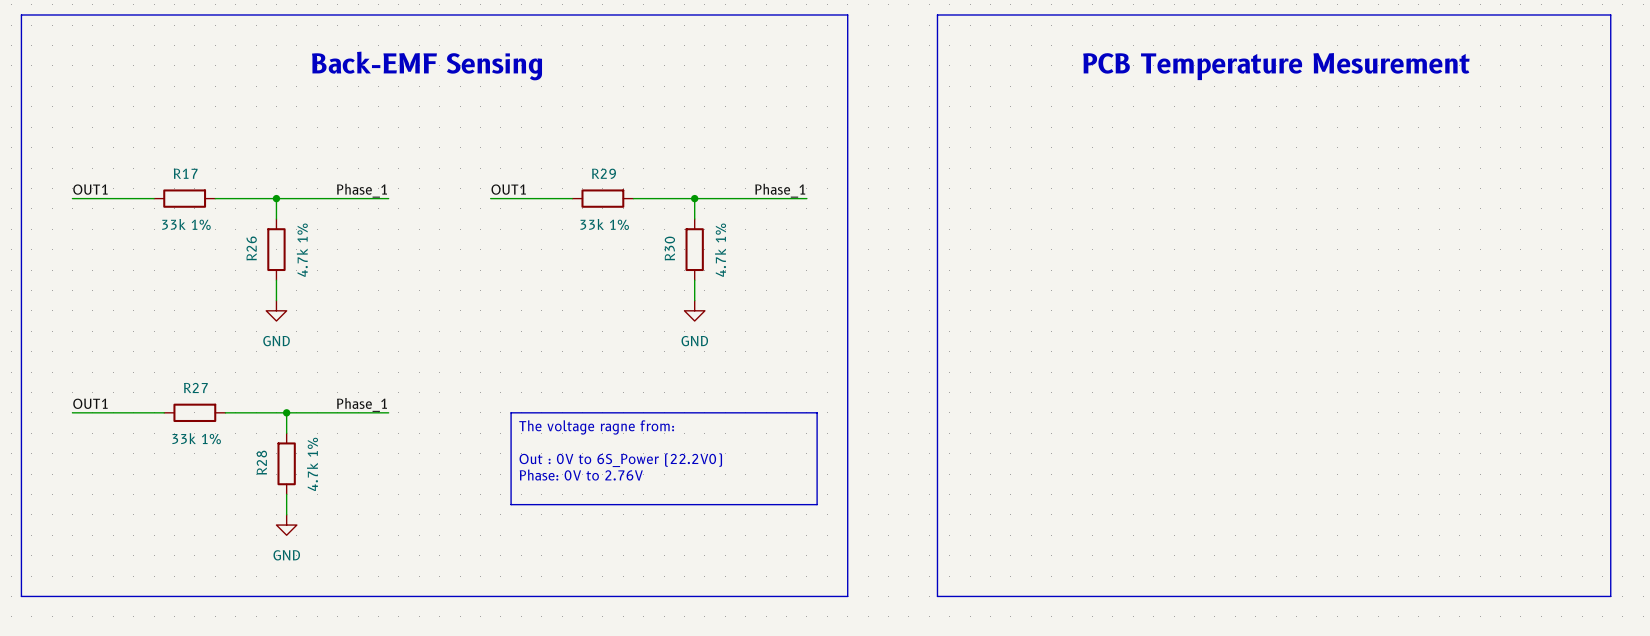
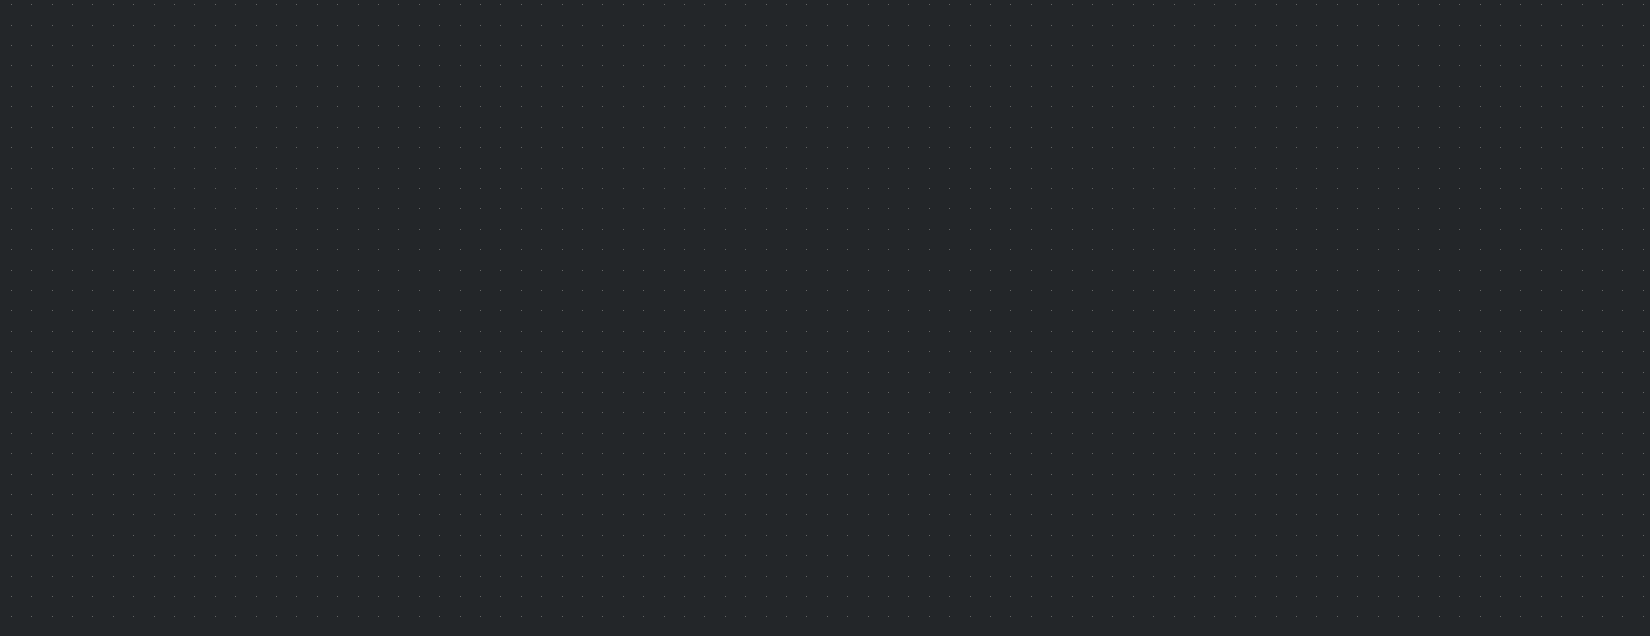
line: (21, 14) (847, 14) (847, 596) (21, 596) (21, 14) -> none
line: (937, 14) (1610, 14) (1610, 596) (937, 596) (937, 14) -> none
text: Back-EMF Sensing (427, 65) -> none
text: PCB Temperature Mesurement (1276, 66) -> none
label: OUT1 (90, 189) -> none
label: OUT1 (508, 189) -> none
label: Phase_1 (362, 190) -> none
label: Phase_1 (780, 190) -> none
wire: (72, 198) (154, 198) -> none
R17: 33k 1% (184, 198) -> none
wire: (215, 198) (388, 198) -> none
wire: (276, 198) (276, 219) -> none
junction: (276, 198) -> none
wire: (490, 198) (572, 198) -> none
R29: 33k 1% (602, 198) -> none
wire: (633, 198) (806, 198) -> none
wire: (694, 198) (694, 219) -> none
junction: (694, 198) -> none
R26: 4.7k 1% (276, 249) -> none
R30: 4.7k 1% (694, 249) -> none
wire: (276, 280) (276, 300) -> none
wire: (694, 280) (694, 300) -> none
power symbol: GND (276, 310) -> none
power symbol: GND (694, 310) -> none
label: OUT1 (90, 403) -> none
label: Phase_1 (362, 404) -> none
wire: (72, 412) (164, 412) -> none
R27: 33k 1% (194, 412) -> none
wire: (225, 412) (388, 412) -> none
wire: (286, 412) (286, 433) -> none
junction: (286, 412) -> none
line: (511, 412) (817, 412) (817, 504) (511, 504) (511, 412) -> none
text: The voltage ragne from: (596, 427) -> none
text: Out : 0V to 6S_Power (22.2V0) (620, 460) -> none
R28: 4.7k 1% (286, 463) -> none
text: Phase: 0V to 2.76V (581, 475) -> none
wire: (286, 494) (286, 514) -> none
power symbol: GND (286, 525) -> none

